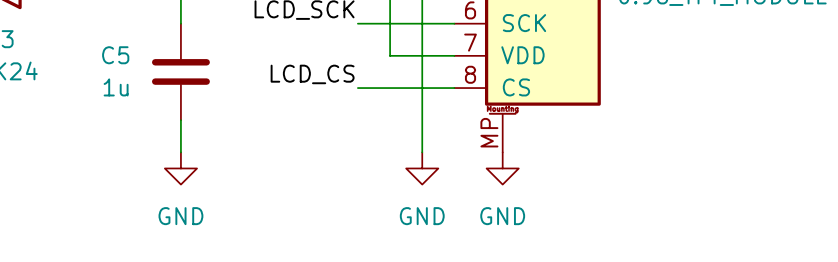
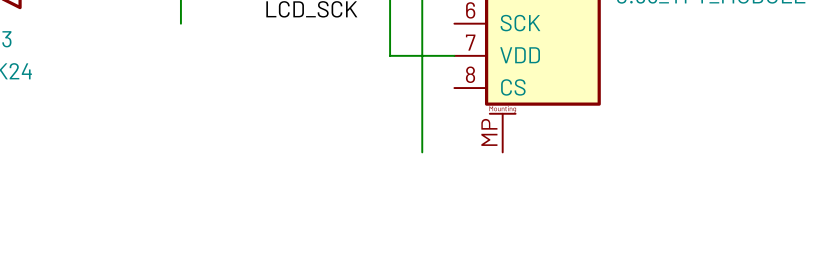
wire: (357, 23) (454, 23) -> none
C5: 1u (180, 71) -> none
label: LCD_CS (312, 74) -> none
wire: (357, 88) (454, 88) -> none
wire: (180, 120) (180, 152) -> none
power symbol: GND (180, 168) -> none
power symbol: GND (422, 168) -> none
power symbol: GND (502, 168) -> none

